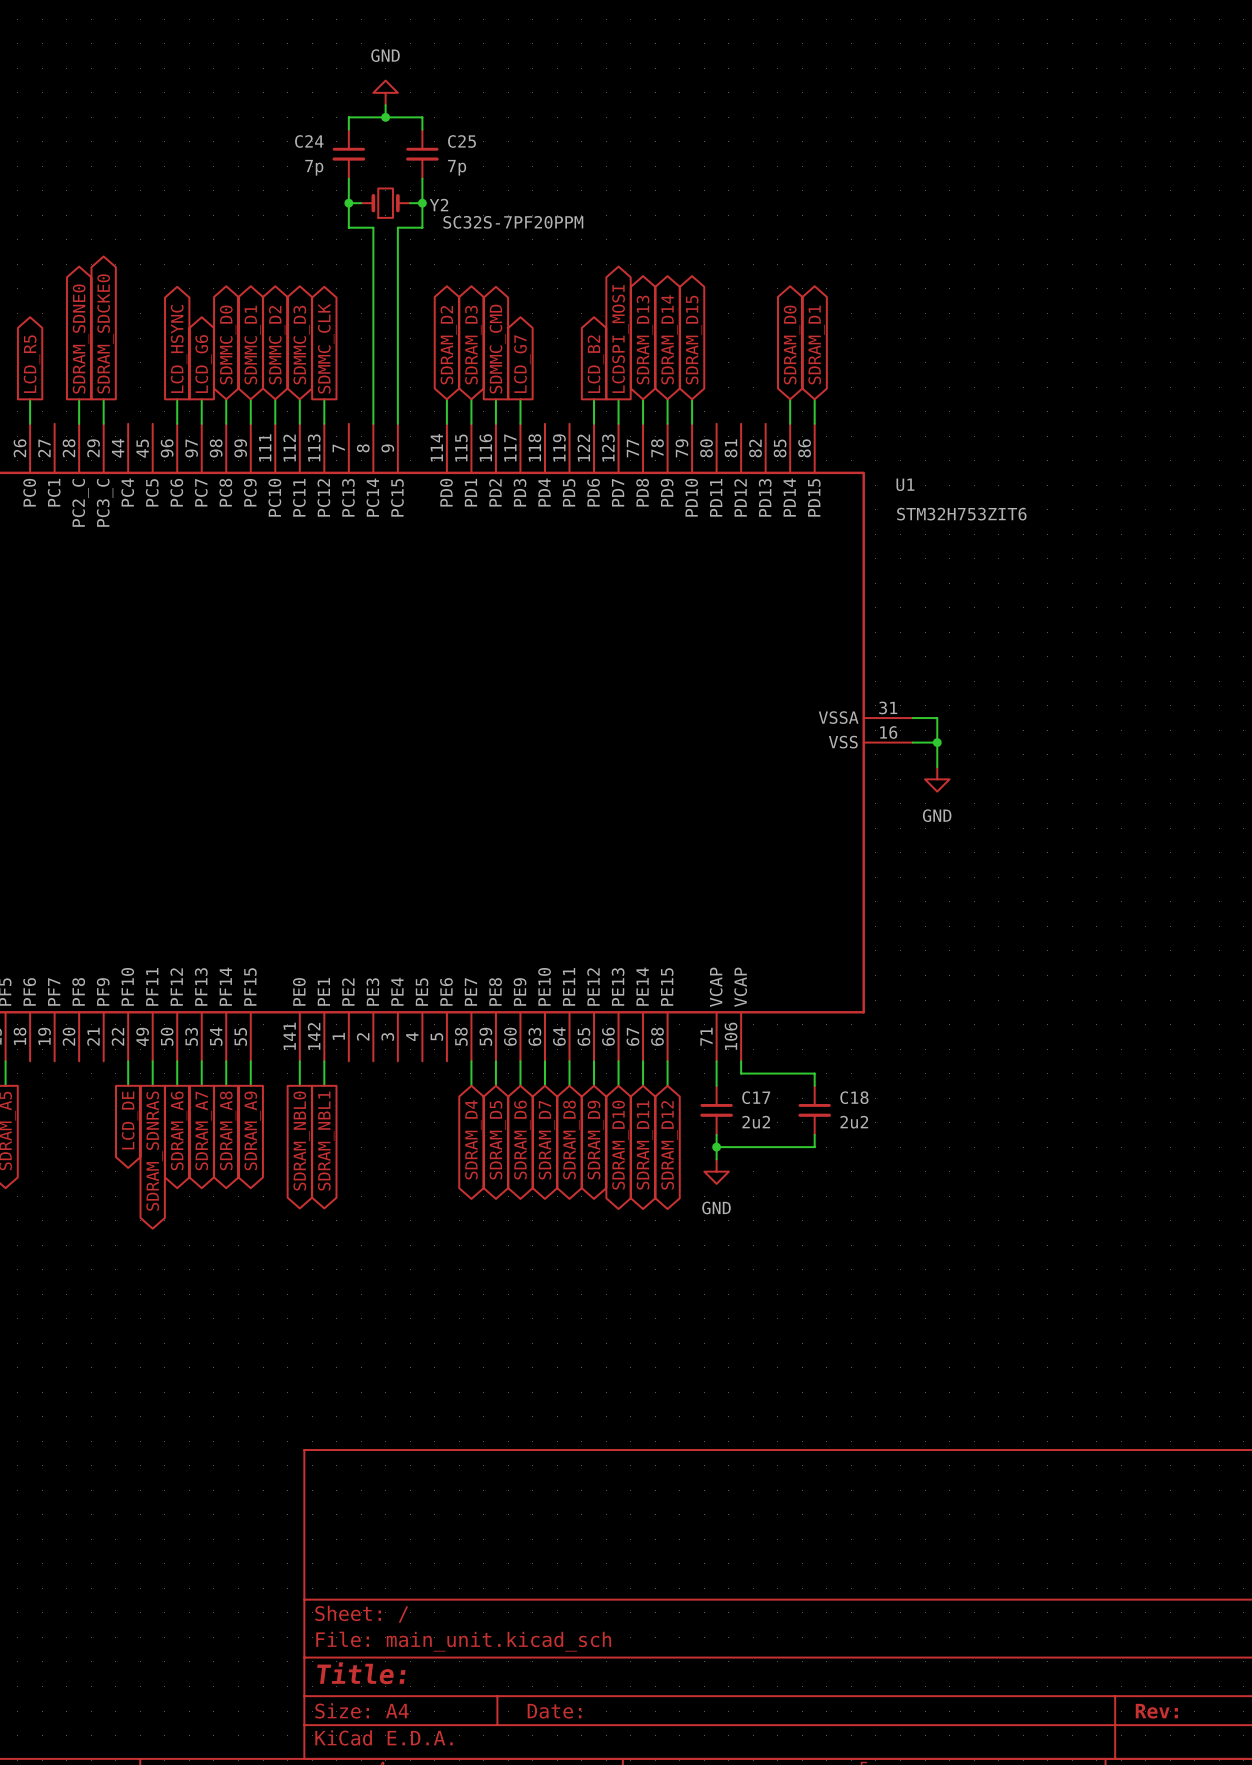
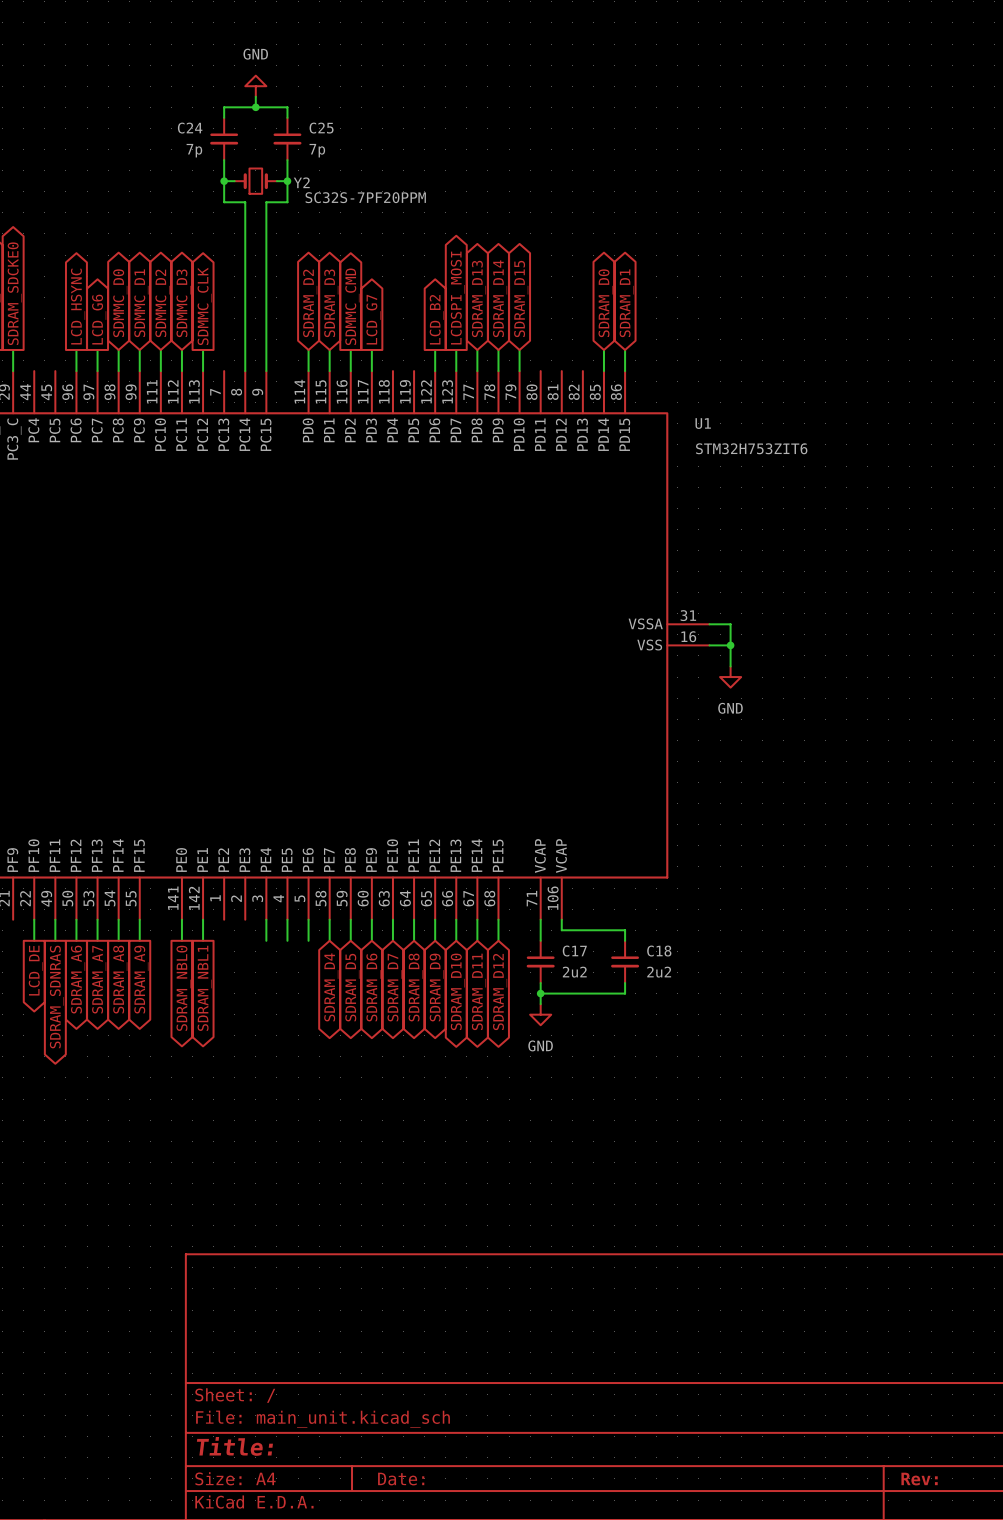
wire: none -> (266, 919) (266, 940)
wire: none -> (287, 919) (287, 940)
wire: none -> (308, 919) (308, 940)

